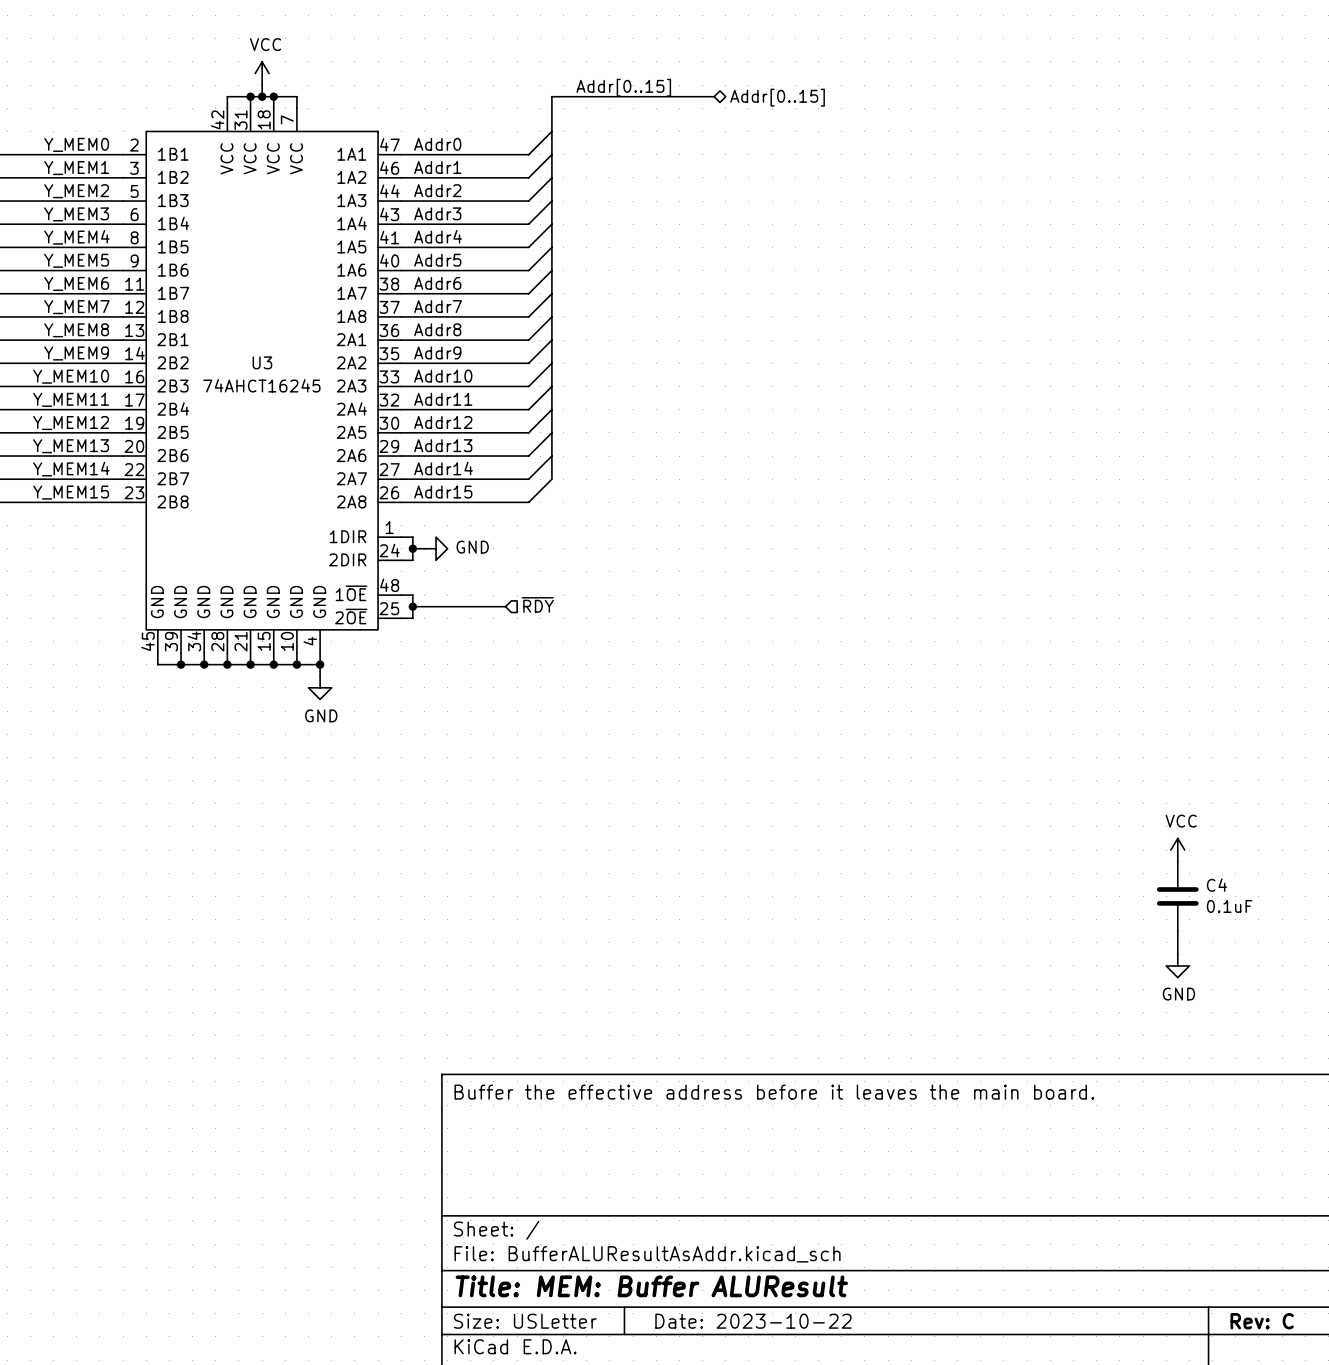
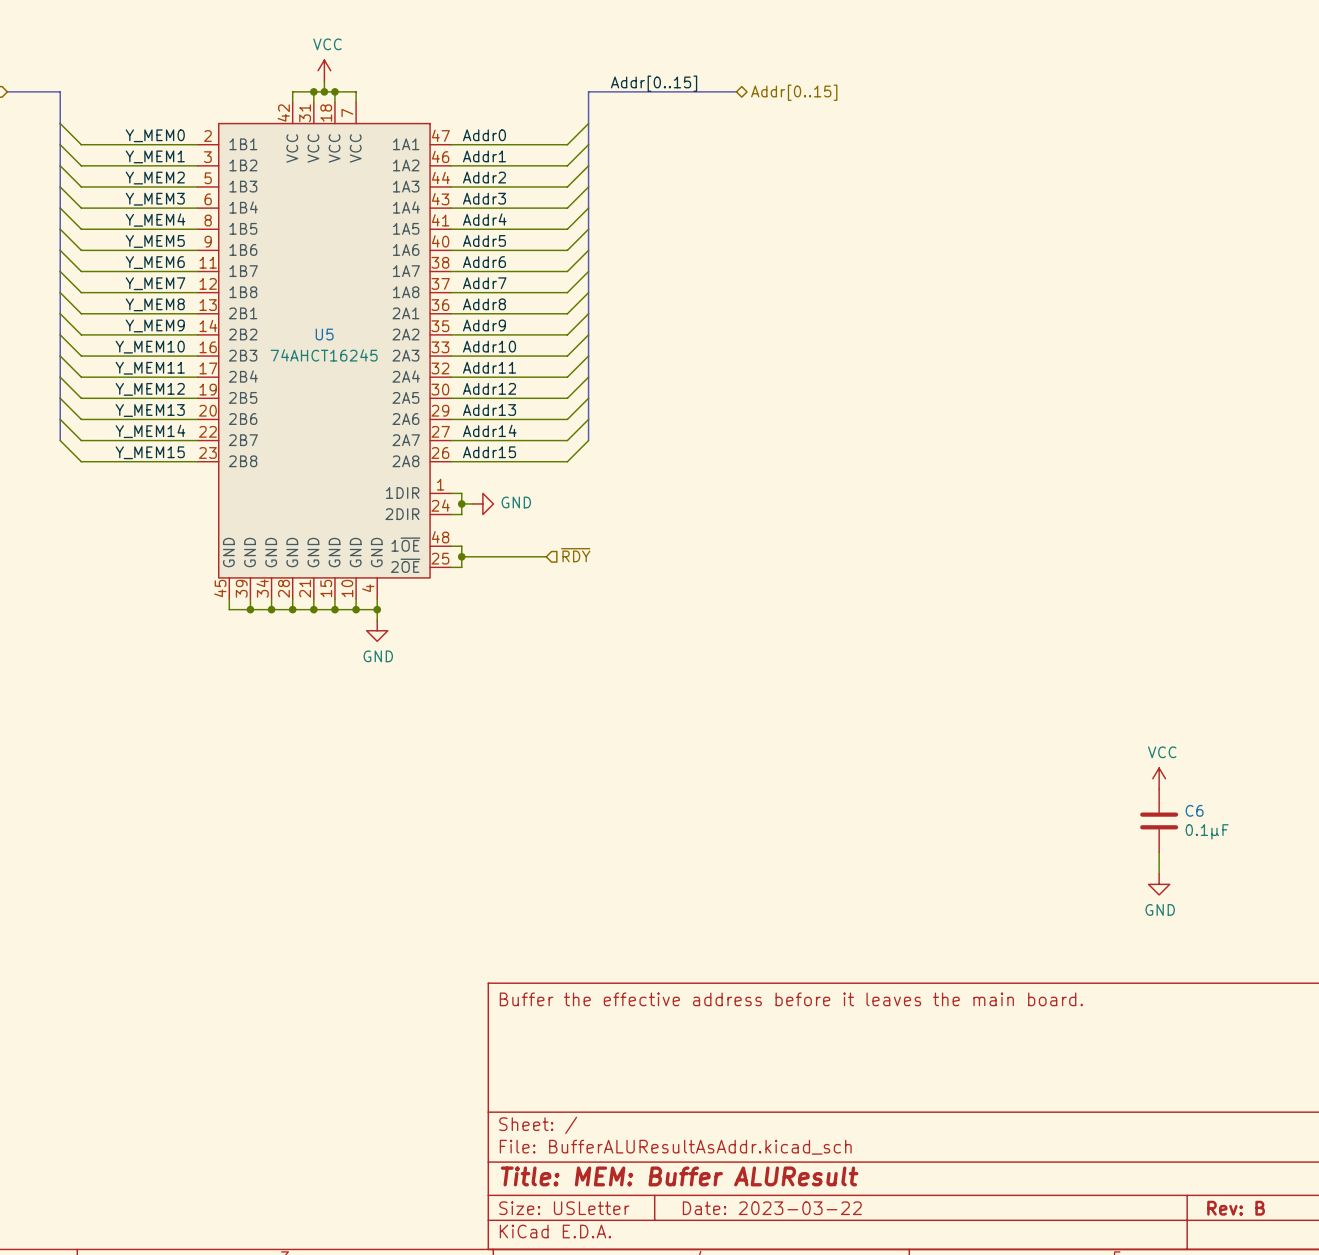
U3 name: U3 (262, 362) -> U5 (324, 334)
C4 name: C4 (1216, 885) -> C6 (1194, 810)
C4 value: 0.1uF (1229, 906) -> 0.1μF (1207, 831)
title block: Date: 2023-10-22 (753, 1321) -> Date: 2023-03-22 (772, 1208)
title block: Rev: C (1262, 1321) -> Rev: B (1236, 1208)

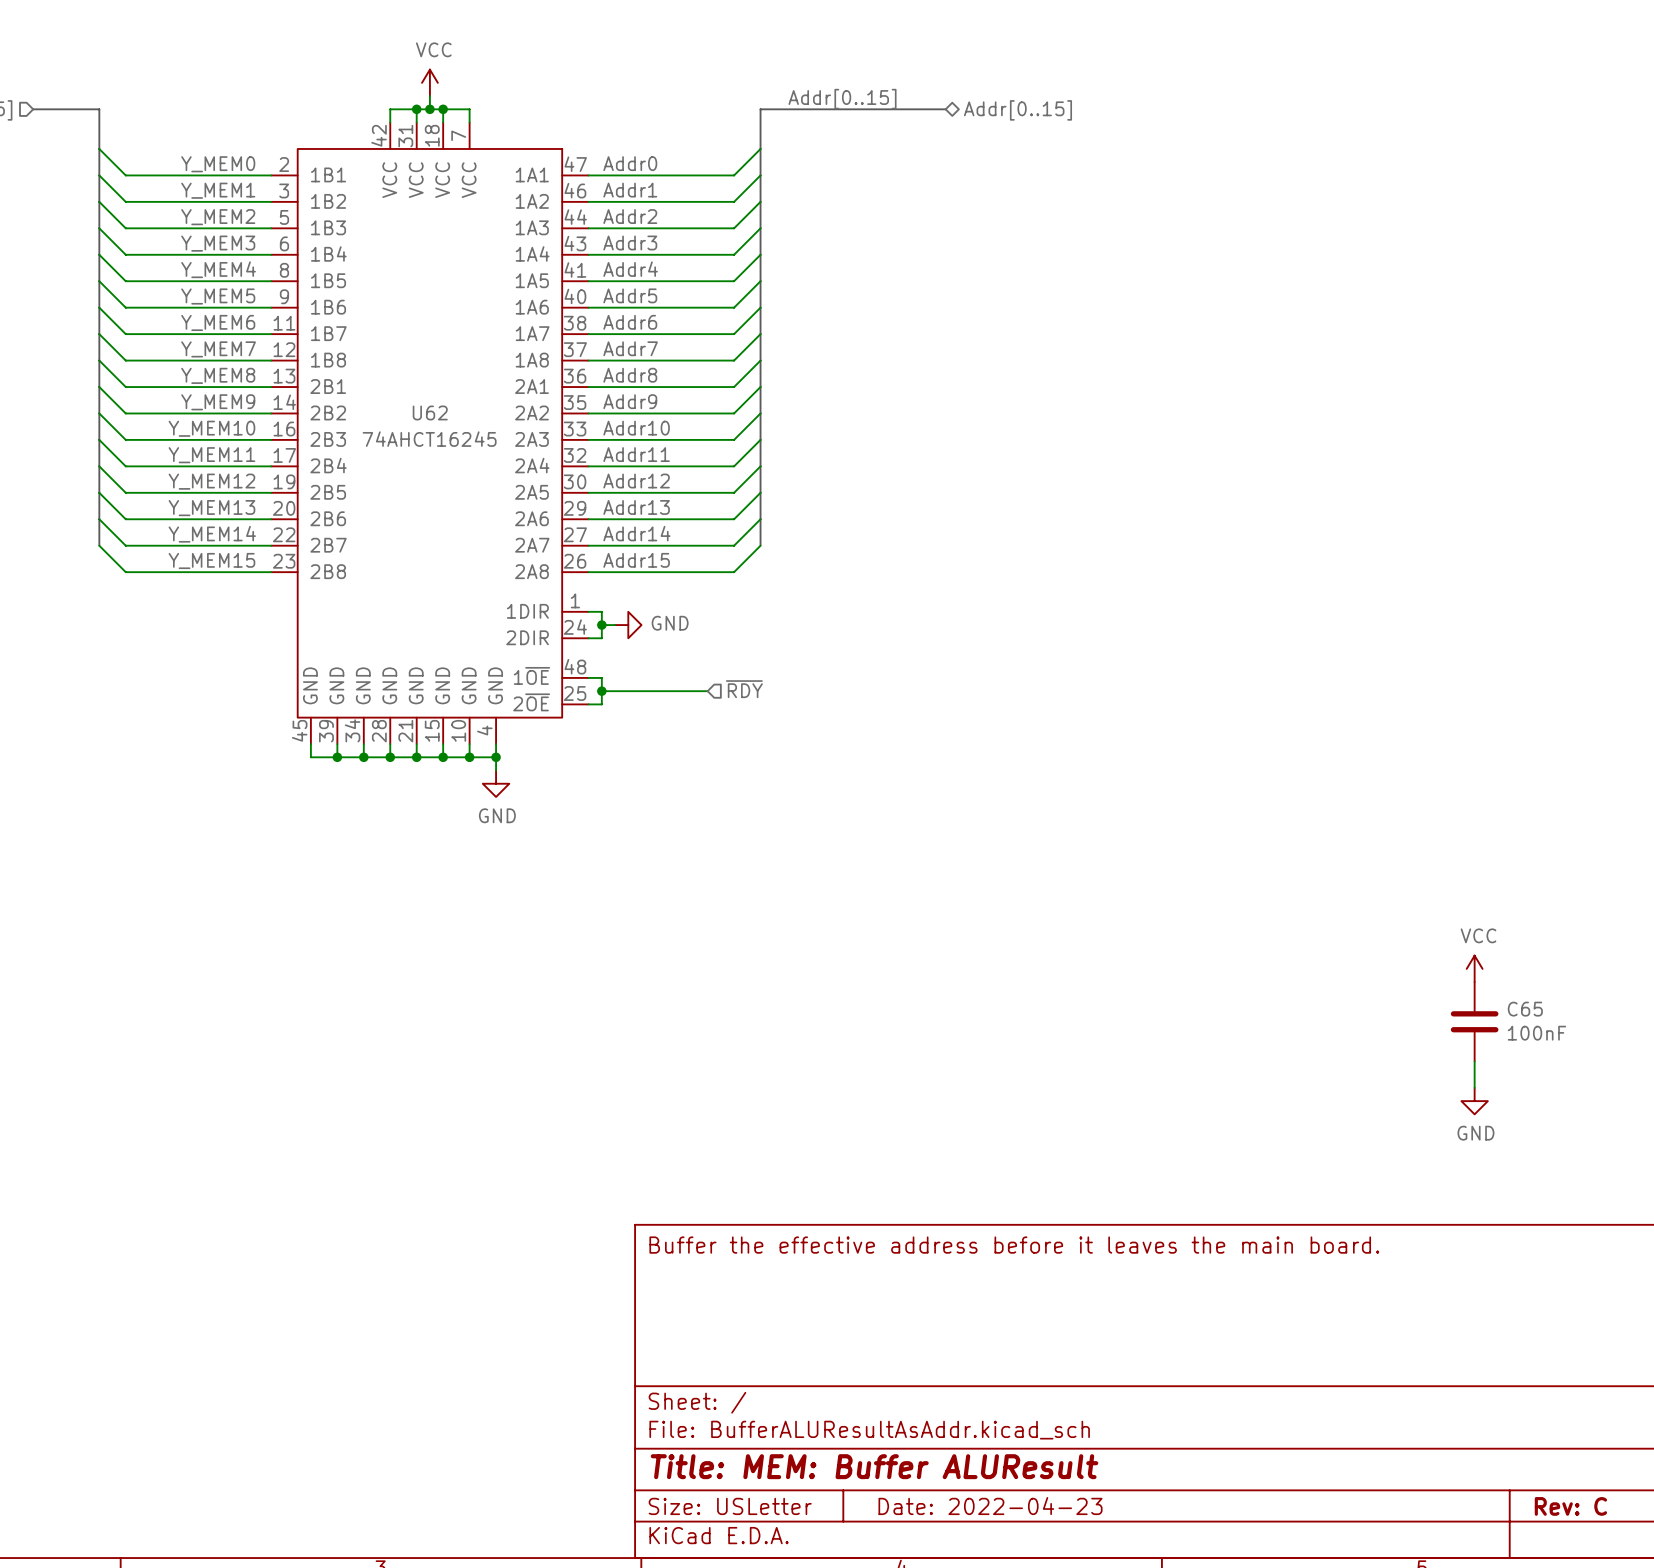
U5 name: U5 (324, 334) -> U62 (430, 412)
C6 name: C6 (1194, 810) -> C65 (1525, 1009)
C6 value: 0.1μF (1207, 831) -> 100nF (1536, 1033)
title block: Date: 2023-03-22 (772, 1208) -> Date: 2022-04-23 (990, 1506)
title block: Rev: B (1236, 1208) -> Rev: C (1570, 1506)

